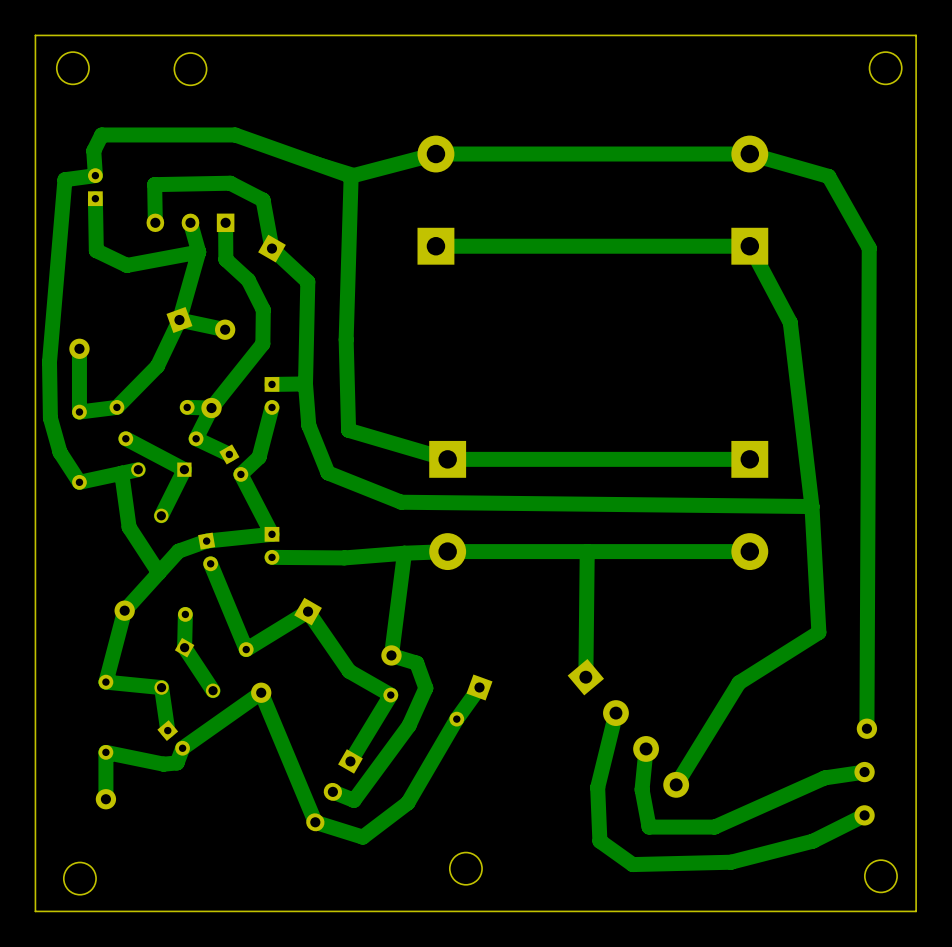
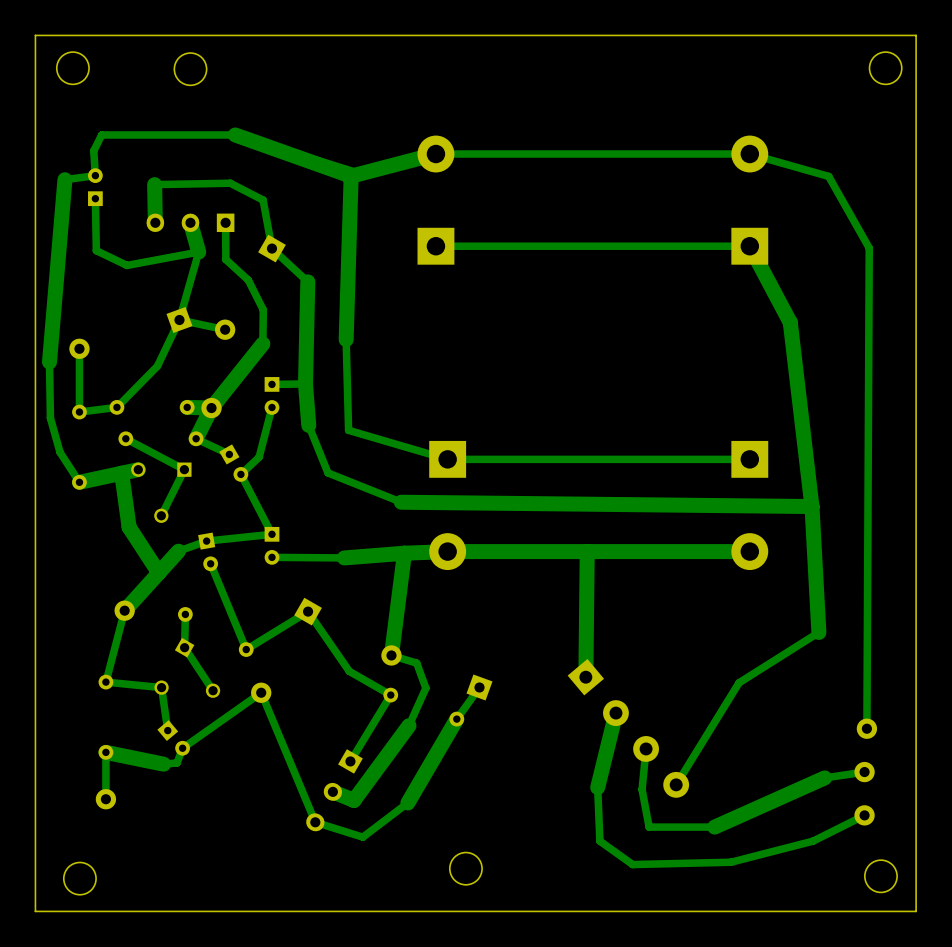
bottom track width: thick (235, 134) (101, 134) (93, 150) (95, 175) (64, 179) -> thin (235, 134) (101, 134) (93, 150) (95, 175) (64, 179)
bottom track width: thick (435, 154) (749, 154) (828, 176) (869, 248) (866, 728) -> thin (435, 154) (749, 154) (828, 176) (869, 248) (866, 728)
bottom track width: thick (154, 184) (230, 183) (263, 200) (271, 248) (307, 281) -> thin (154, 184) (230, 183) (263, 200) (271, 248) (307, 281)
bottom track width: thick (95, 198) (96, 250) (127, 265) (198, 252) (179, 320) -> thin (95, 198) (96, 250) (127, 265) (198, 252) (179, 320)
bottom track width: thick (225, 222) (225, 259) (248, 280) (263, 309) (262, 343) -> thin (225, 222) (225, 259) (248, 280) (263, 309) (262, 343)
bottom track width: thick (749, 246) (435, 246) -> thin (749, 246) (435, 246)
bottom track width: thick (179, 320) (225, 329) -> thin (179, 320) (225, 329)
bottom track width: thick (179, 320) (157, 366) (116, 407) (79, 412) (79, 348) -> thin (179, 320) (157, 366) (116, 407) (79, 412) (79, 348)
bottom track width: thick (346, 339) (348, 430) (447, 459) (749, 459) -> thin (346, 339) (348, 430) (447, 459) (749, 459)
bottom track width: thick (49, 362) (50, 418) (60, 452) (79, 482) -> thin (49, 362) (50, 418) (60, 452) (79, 482)
bottom track width: thick (305, 383) (271, 384) -> thin (305, 383) (271, 384)
bottom track width: thick (271, 407) (259, 457) (240, 474) (271, 534) (206, 541) (178, 551) -> thin (271, 407) (259, 457) (240, 474) (271, 534) (206, 541) (178, 551)
bottom track width: thick (308, 425) (327, 472) (401, 502) -> thin (308, 425) (327, 472) (401, 502)
bottom track width: thick (125, 438) (184, 469) (161, 515) -> thin (125, 438) (184, 469) (161, 515)
bottom track width: thick (196, 438) (229, 454) -> thin (196, 438) (229, 454)
bottom track width: thick (271, 557) (344, 557) -> thin (271, 557) (344, 557)
bottom track width: thick (210, 563) (246, 649) (308, 611) (349, 671) (390, 695) (350, 761) -> thin (210, 563) (246, 649) (308, 611) (349, 671) (390, 695) (350, 761)
bottom track width: thick (124, 610) (105, 682) (161, 687) (167, 730) -> thin (124, 610) (105, 682) (161, 687) (167, 730)
bottom track width: thick (185, 614) (184, 647) (213, 690) -> thin (185, 614) (184, 647) (213, 690)
bottom track width: thick (818, 632) (739, 682) (676, 784) -> thin (818, 632) (739, 682) (676, 784)
bottom track width: thick (391, 655) (416, 663) (425, 688) (409, 725) -> thin (391, 655) (416, 663) (425, 688) (409, 725)
bottom track width: thick (479, 687) (456, 719) -> thin (479, 687) (456, 719)
bottom track width: thick (646, 748) (642, 789) (649, 827) (714, 827) -> thin (646, 748) (642, 789) (649, 827) (714, 827)
bottom track width: thick (105, 752) (105, 799) -> thin (105, 752) (105, 799)
bottom track width: thick (163, 764) (177, 762) (182, 748) (261, 692) (315, 822) (362, 837) (407, 802) -> thin (163, 764) (177, 762) (182, 748) (261, 692) (315, 822) (362, 837) (407, 802)
bottom track width: thick (864, 772) (824, 777) -> thin (864, 772) (824, 777)
bottom track width: thick (597, 787) (599, 841) (632, 864) (731, 862) (813, 841) (864, 815) -> thin (597, 787) (599, 841) (632, 864) (731, 862) (813, 841) (864, 815)

